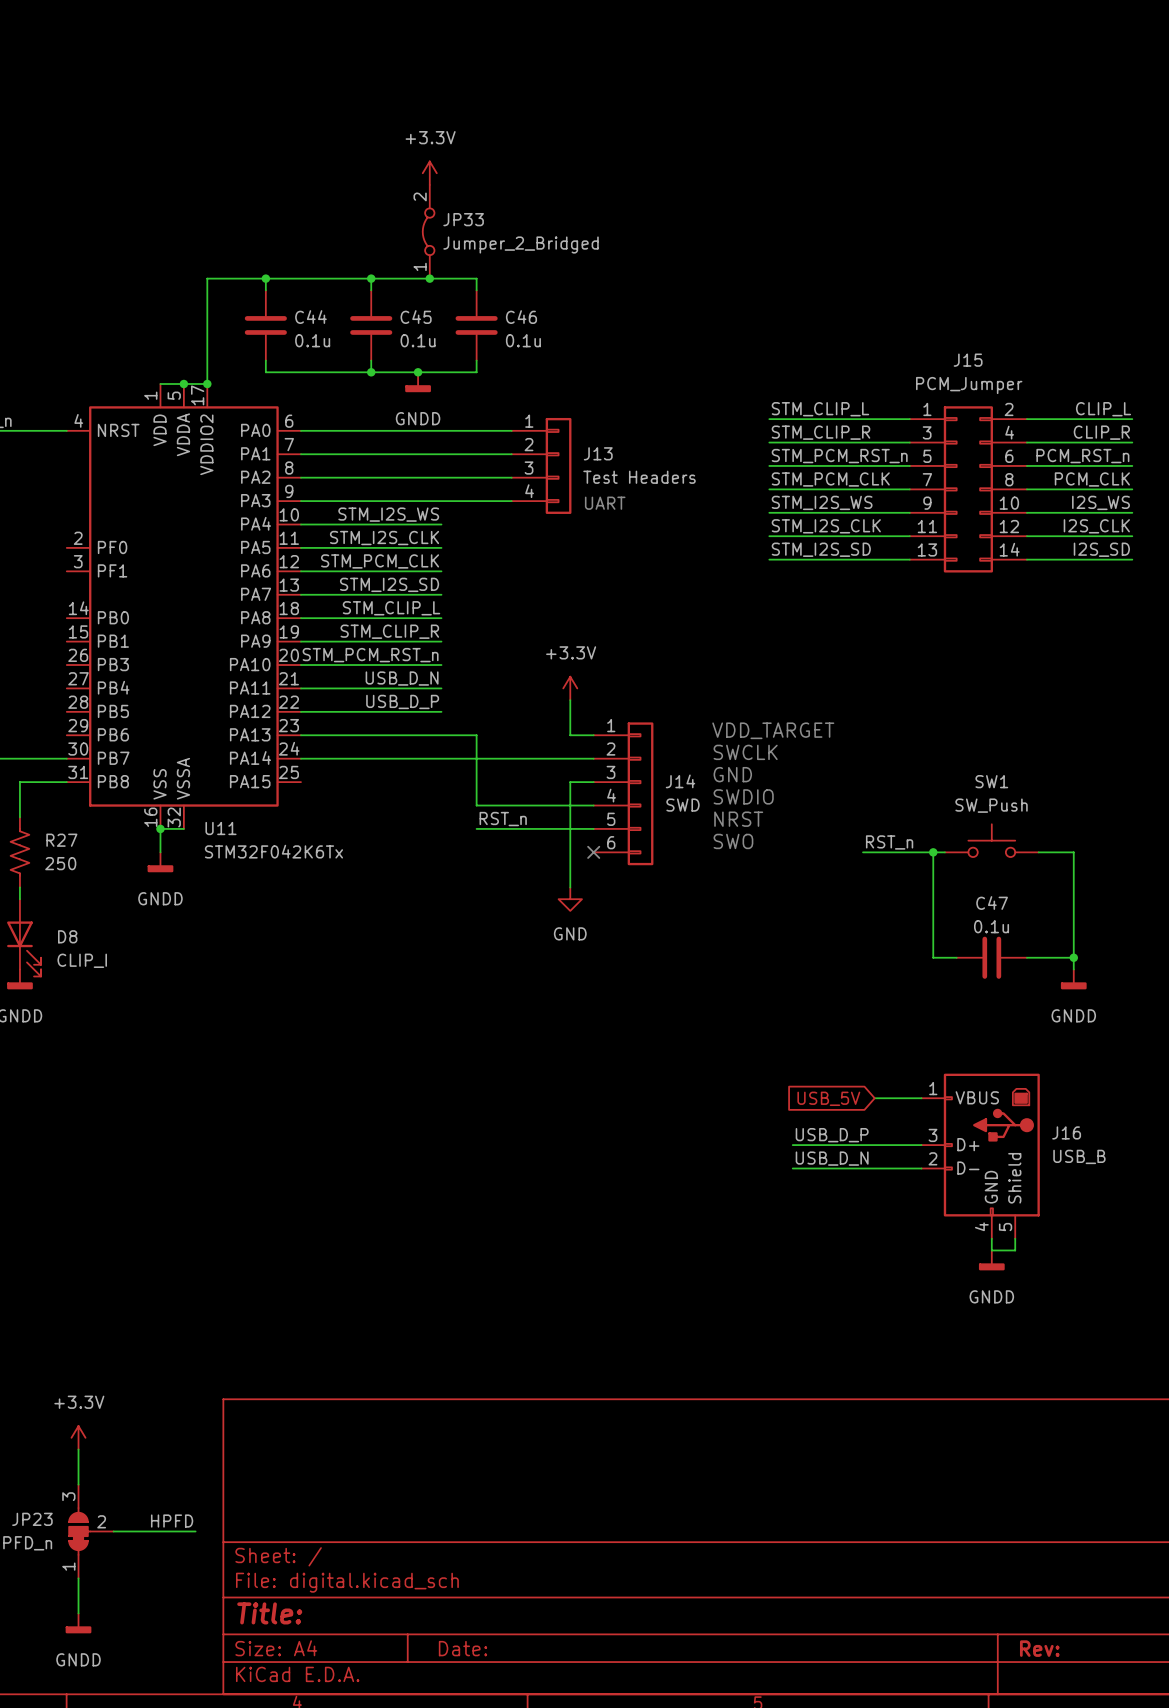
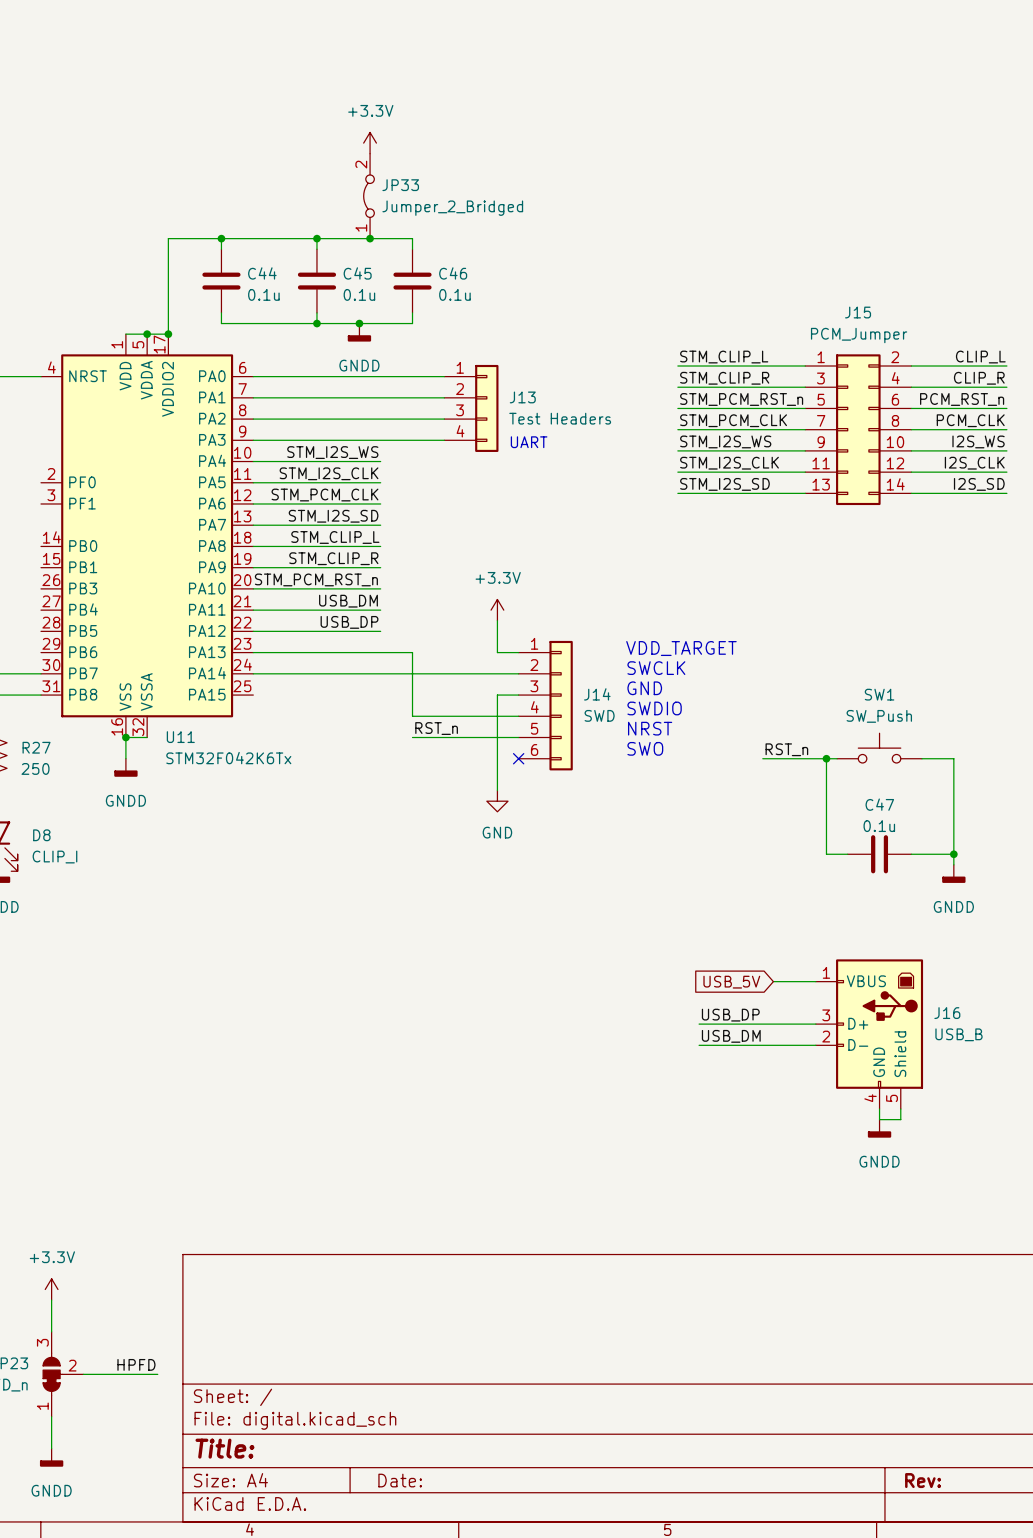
label: USB_D_N (402, 678) -> USB_DM (348, 601)
label: USB_D_P (402, 701) -> USB_DP (349, 622)
label: USB_D_P (832, 1135) -> USB_DP (730, 1015)
label: USB_D_N (832, 1158) -> USB_DM (731, 1036)

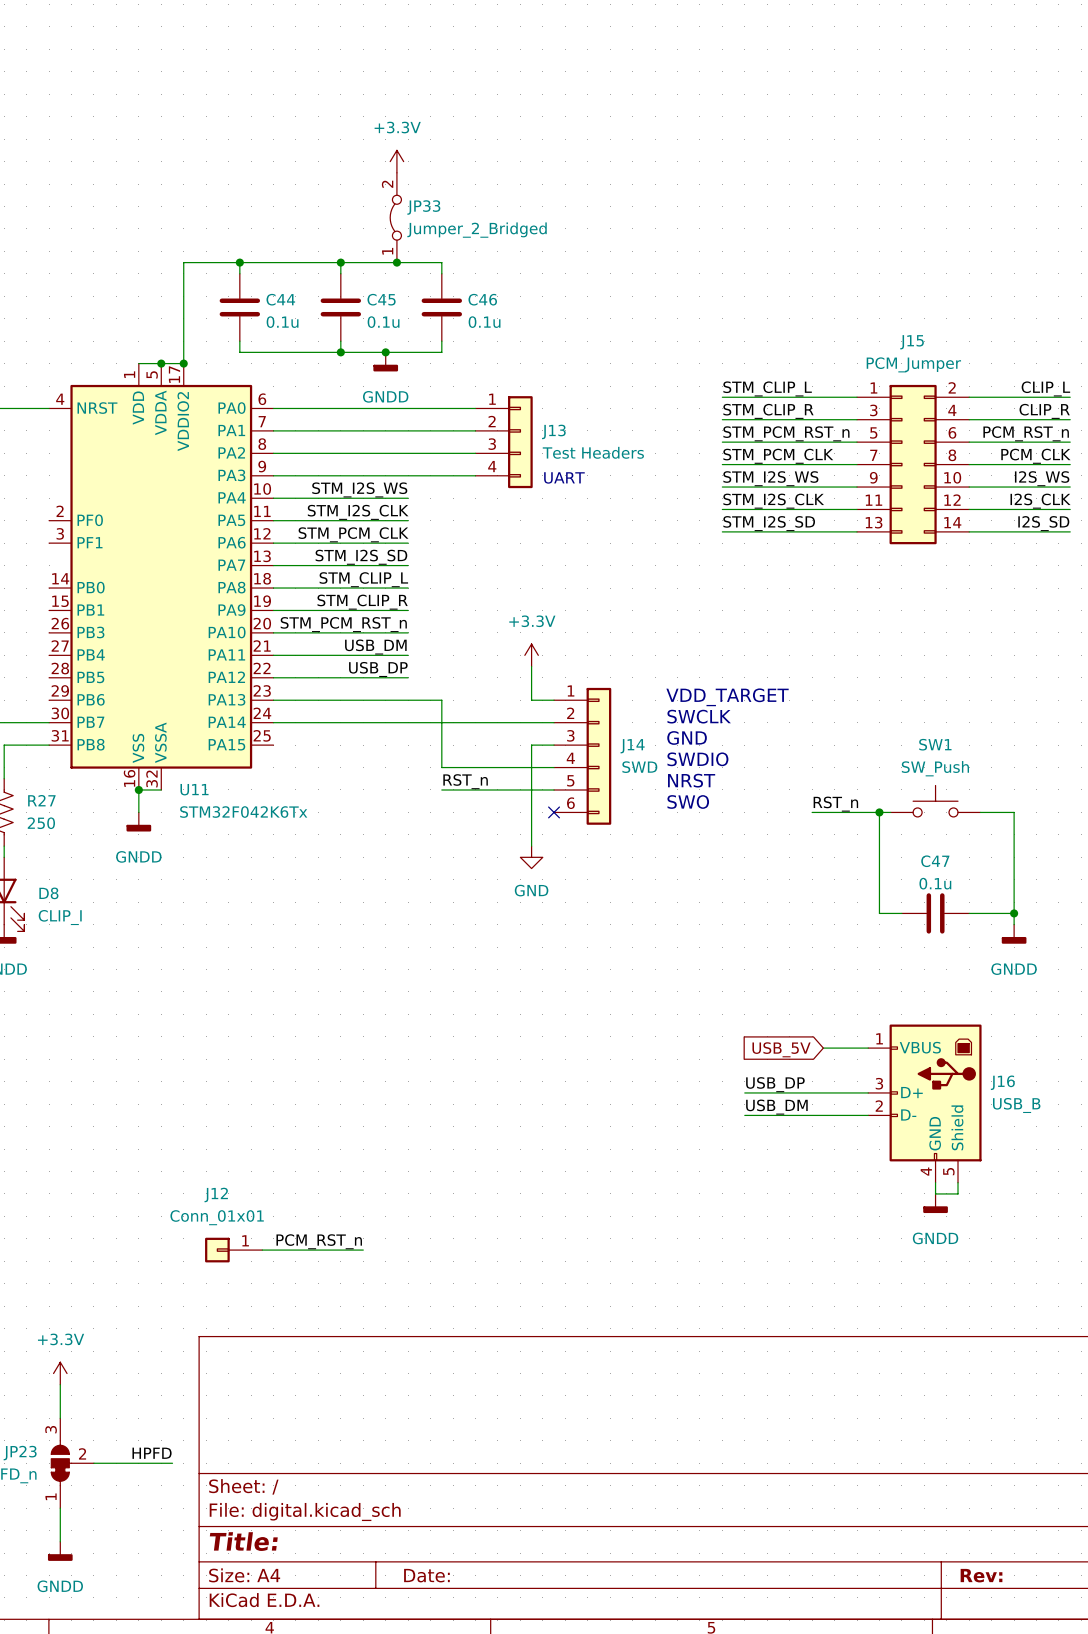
label: none -> PCM_RST_n (319, 1241)
J12: none -> Conn_01x01 (233, 1250)
wire: none -> (262, 1250) (363, 1250)

